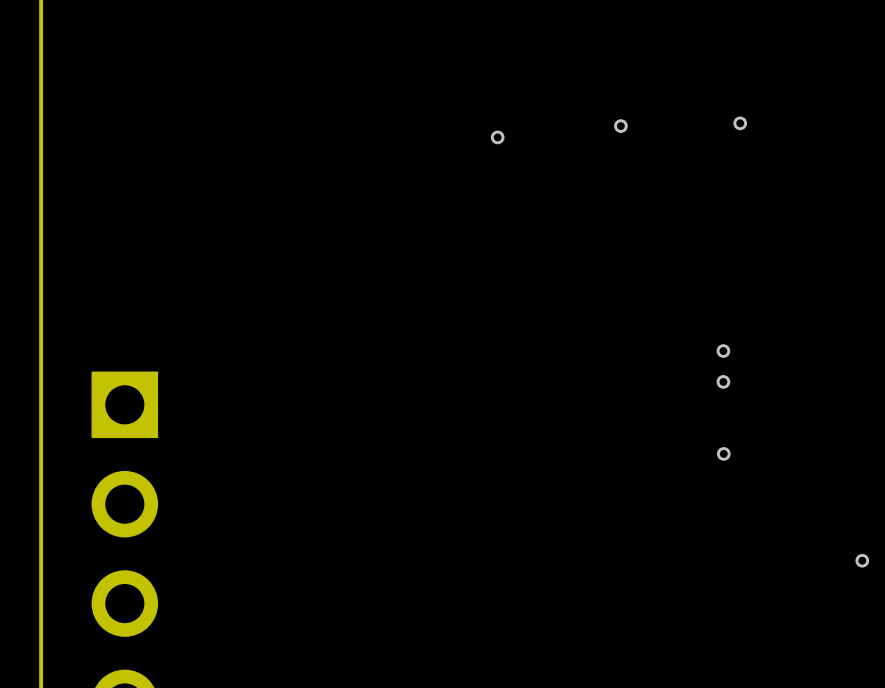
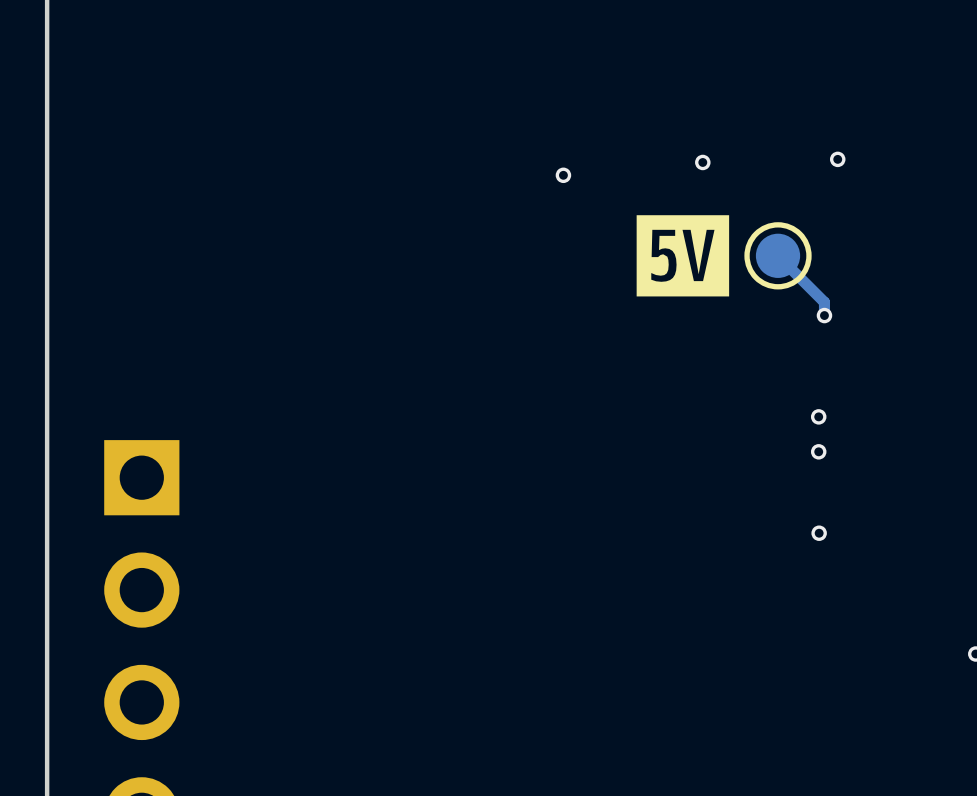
drawing: none -> [636, 215, 730, 297]
track: none -> (778, 255) (824, 302) (824, 315)
part: none -> (778, 255)
via: none -> (824, 315)

